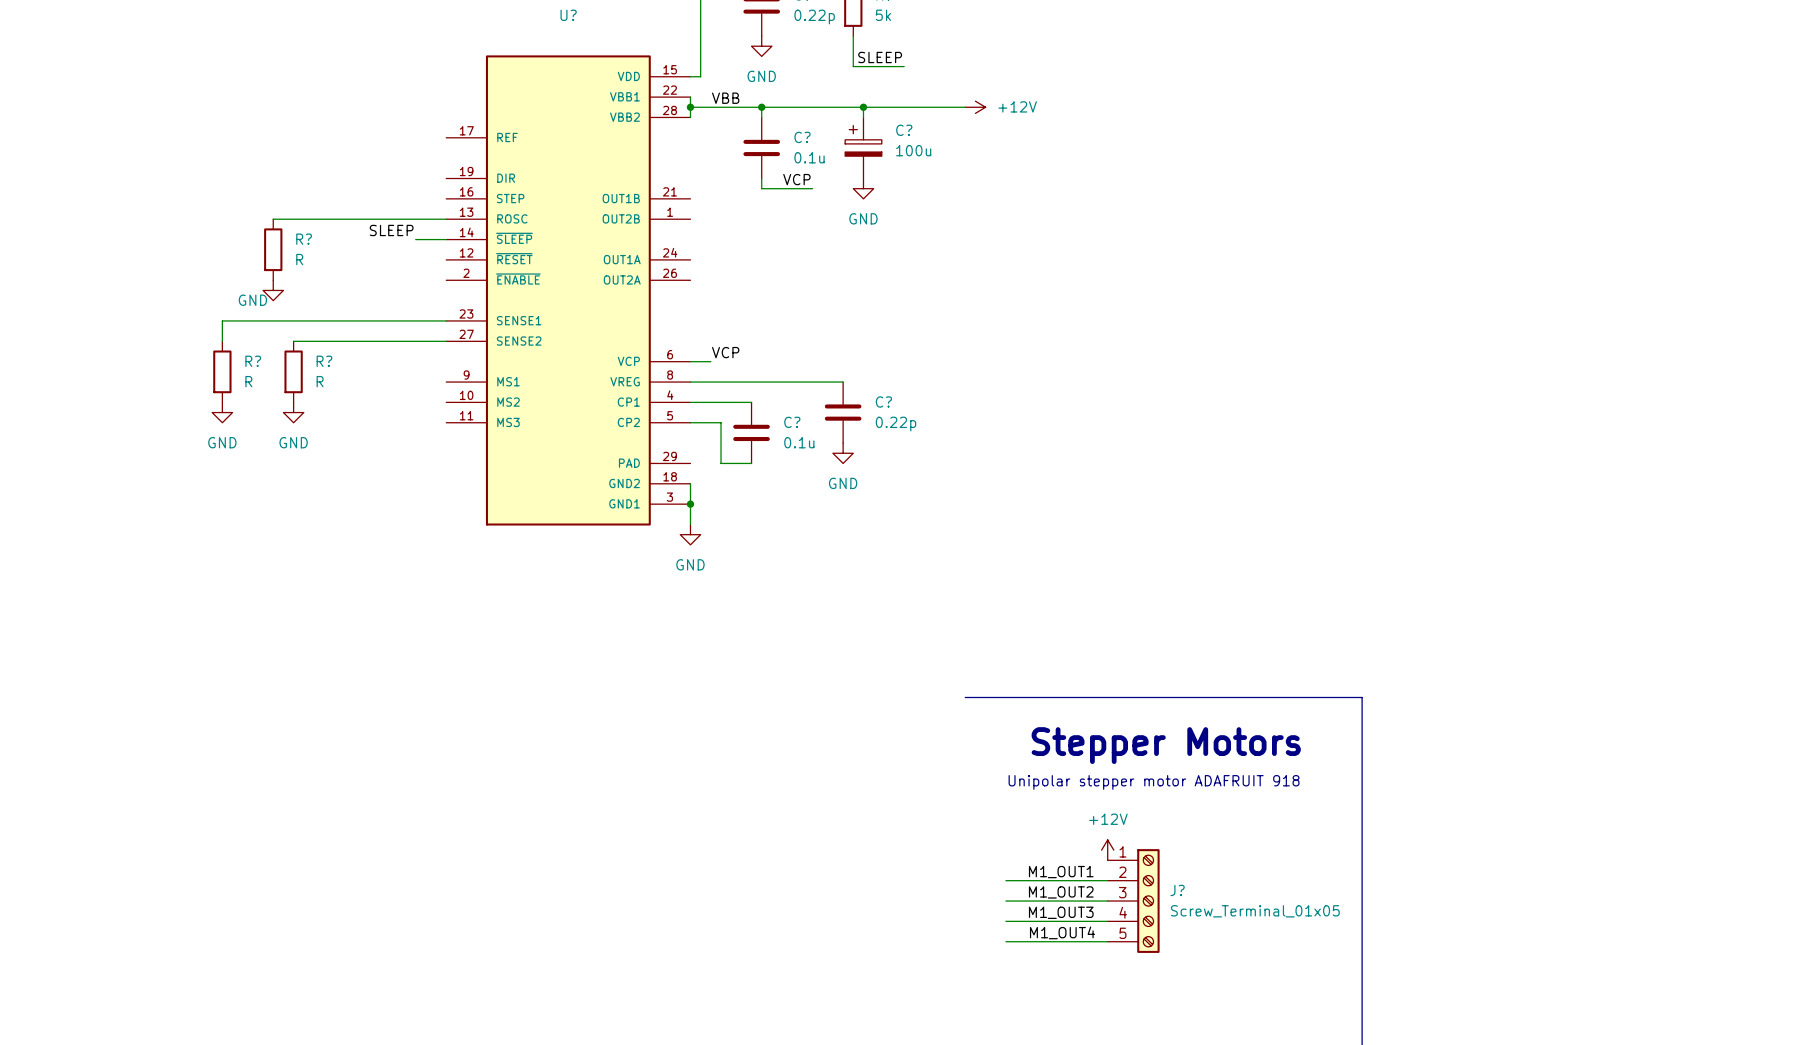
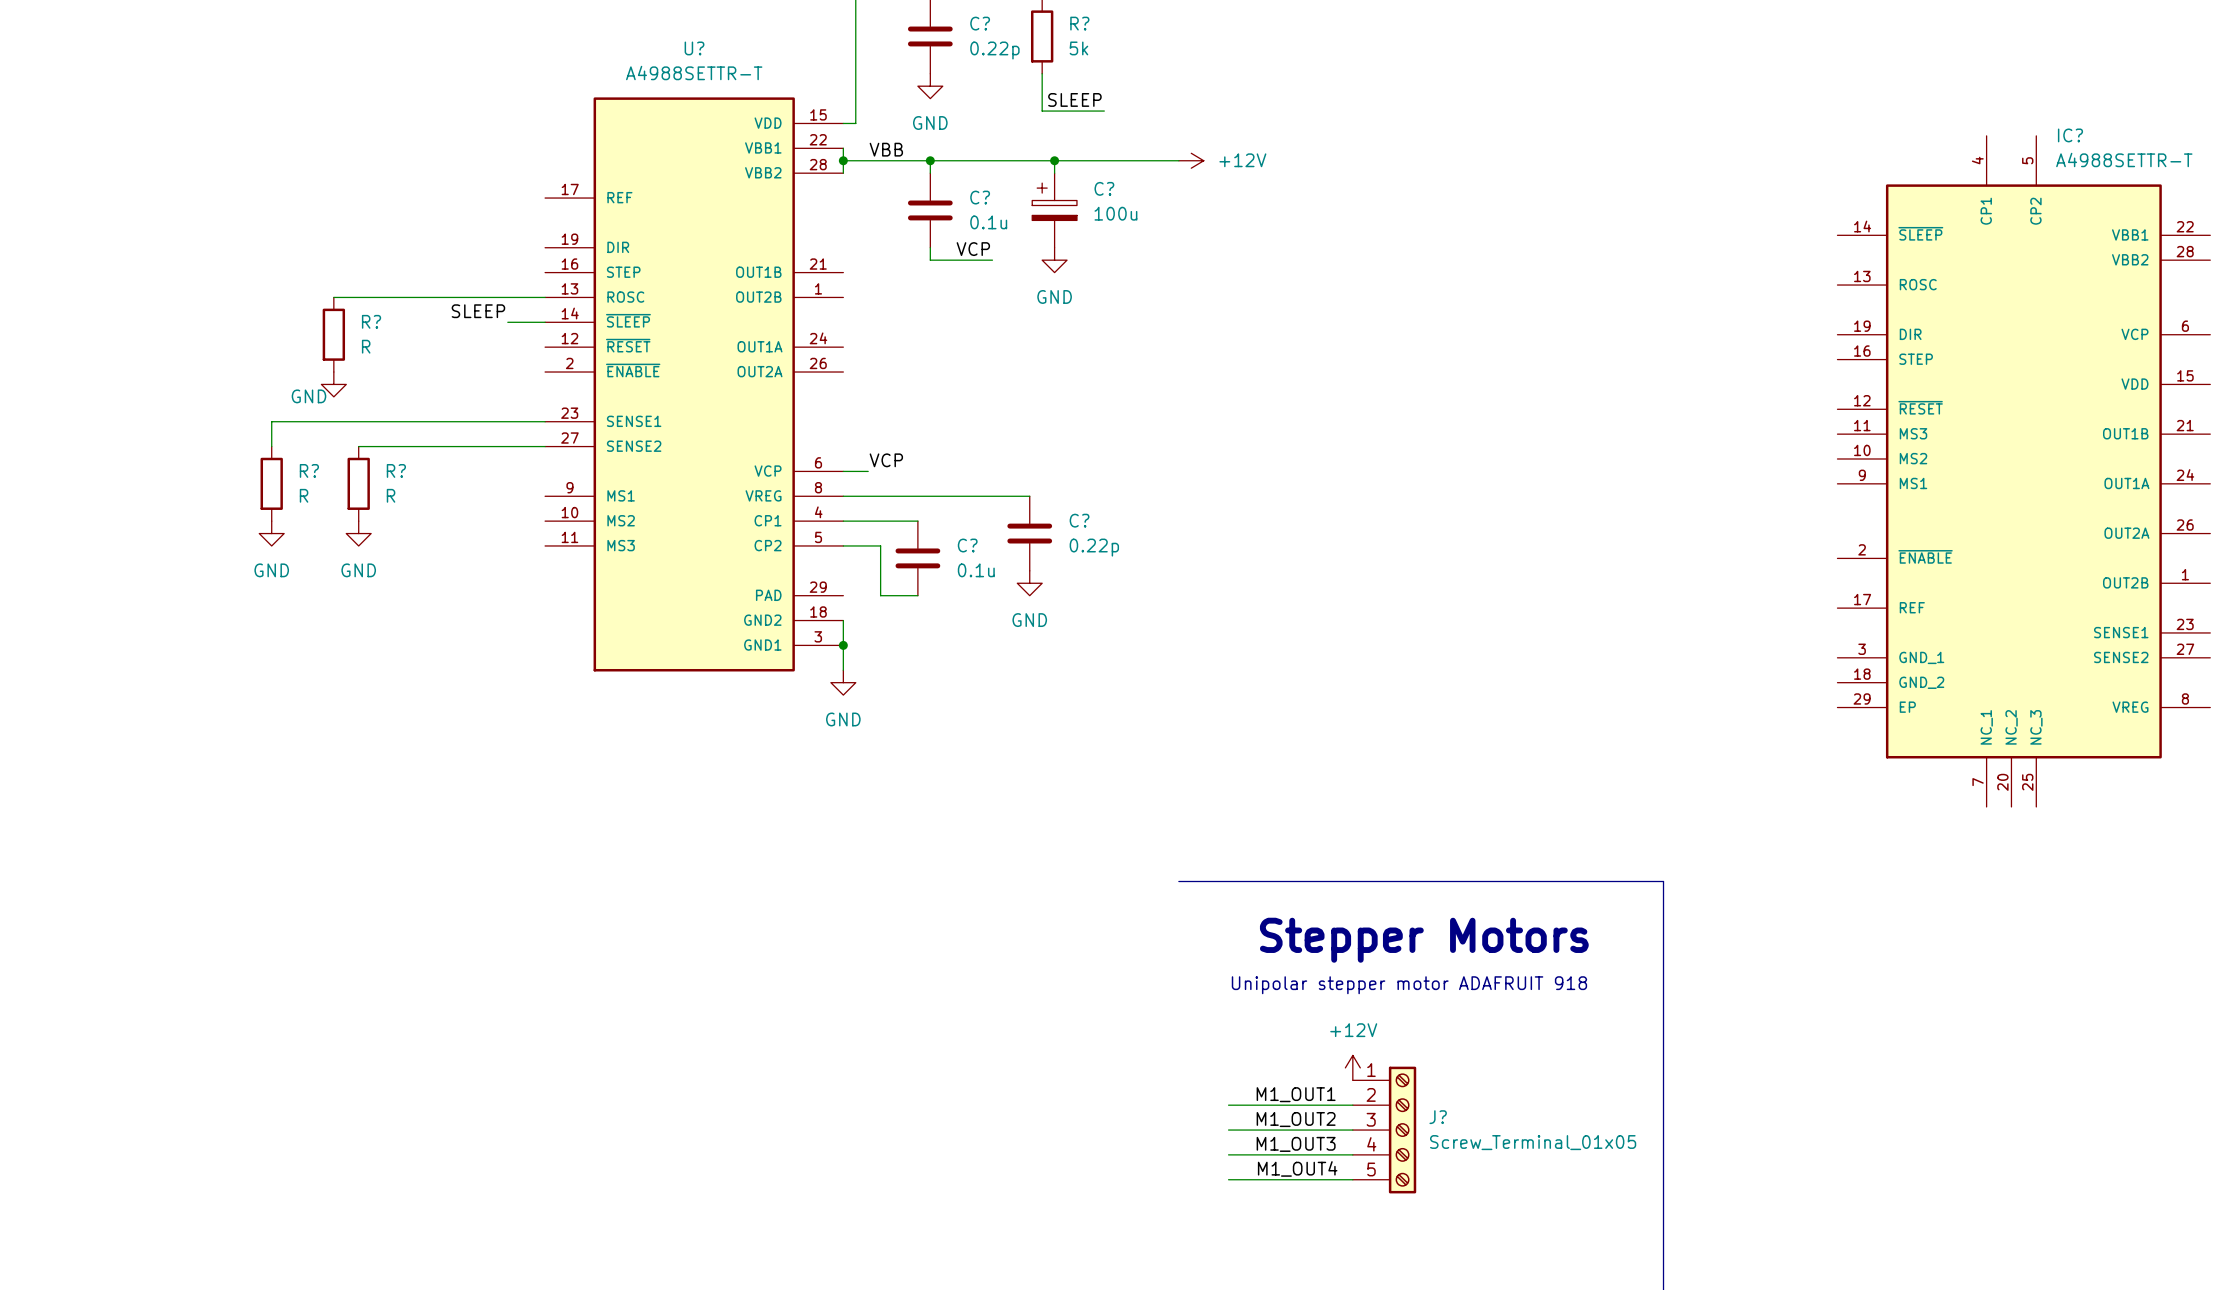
U? value: none -> A4988SETTR-T (694, 73)
IC?: none -> A4988SETTR-T (2023, 471)

